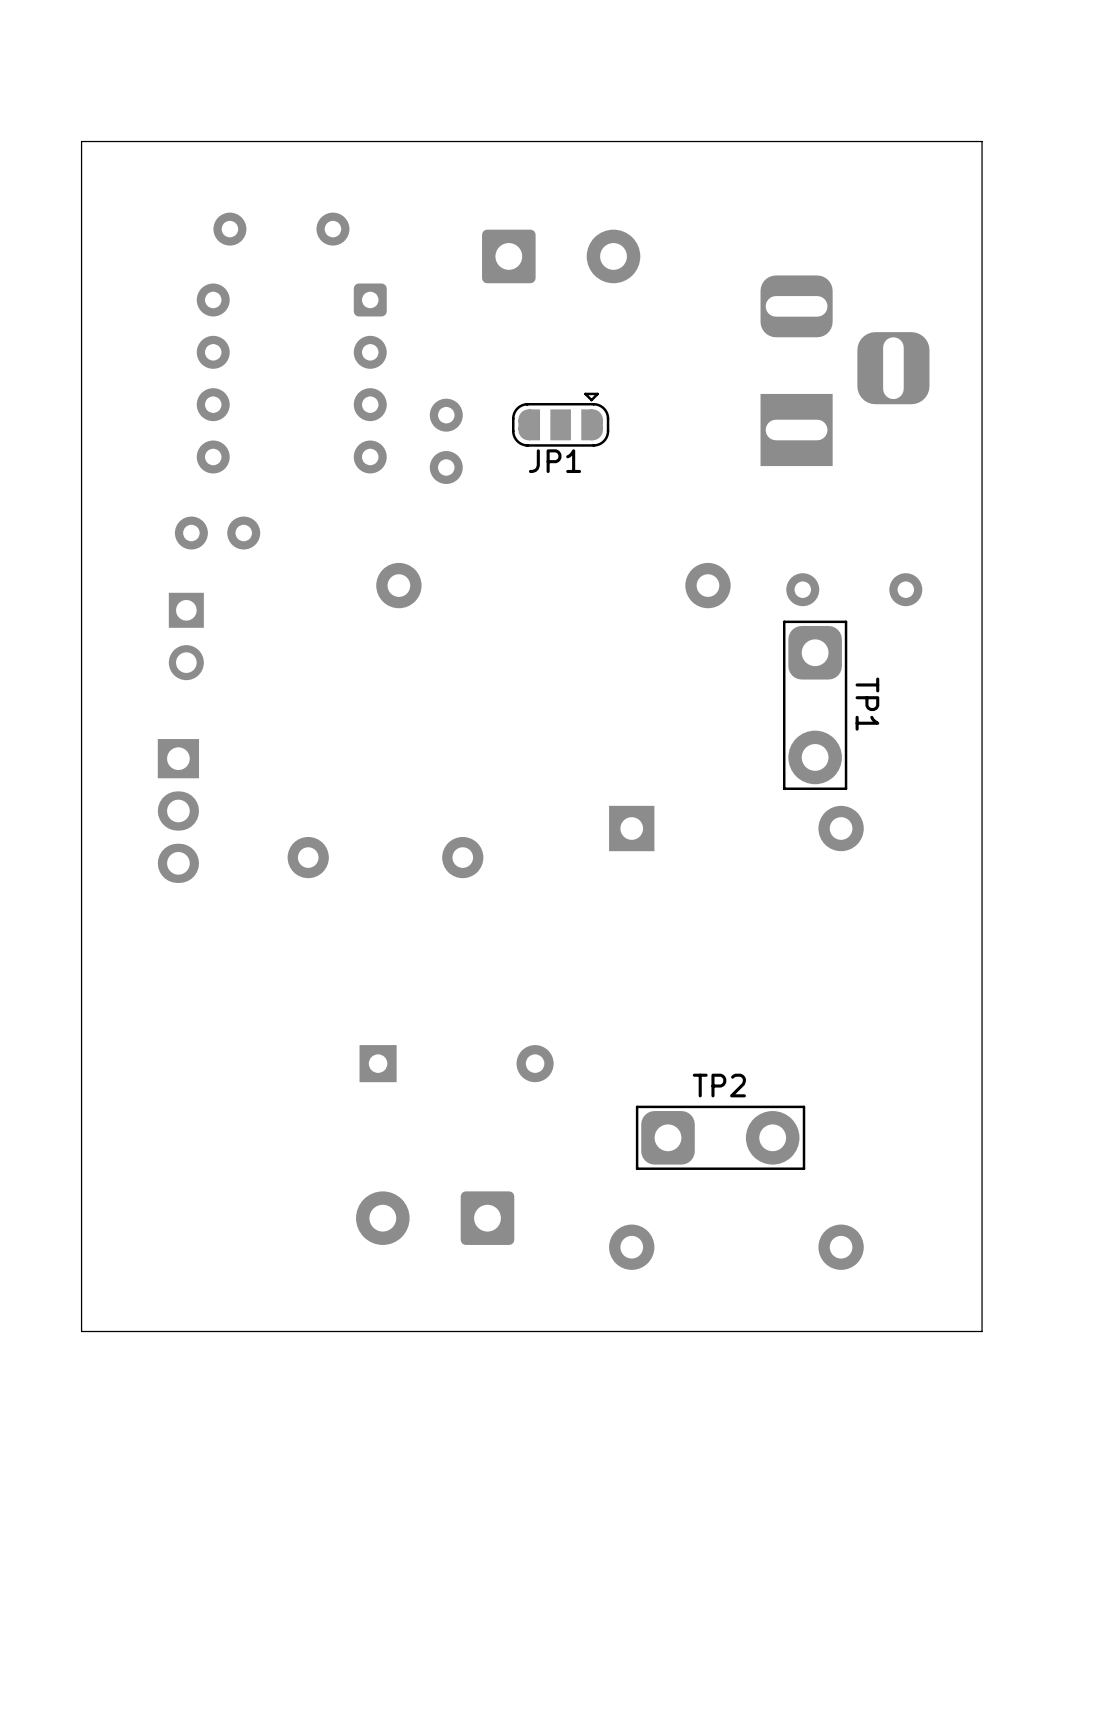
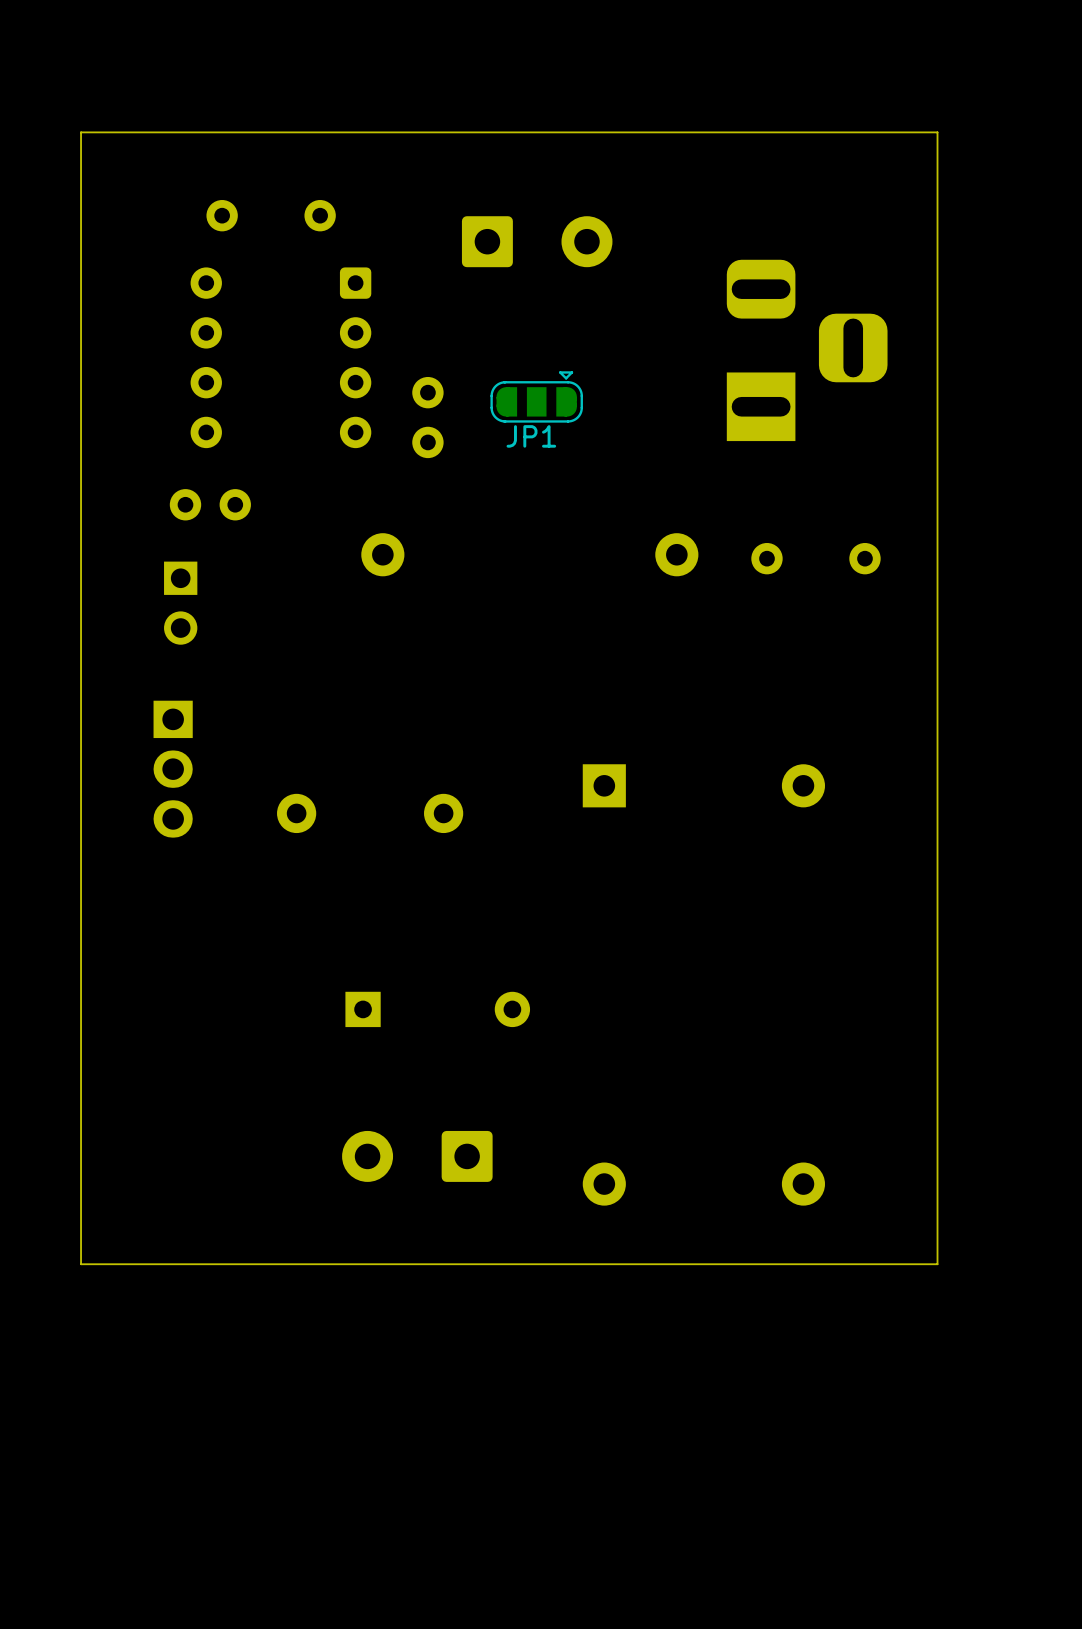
TP1: (815, 705) -> none
TP2: (720, 1137) -> none

